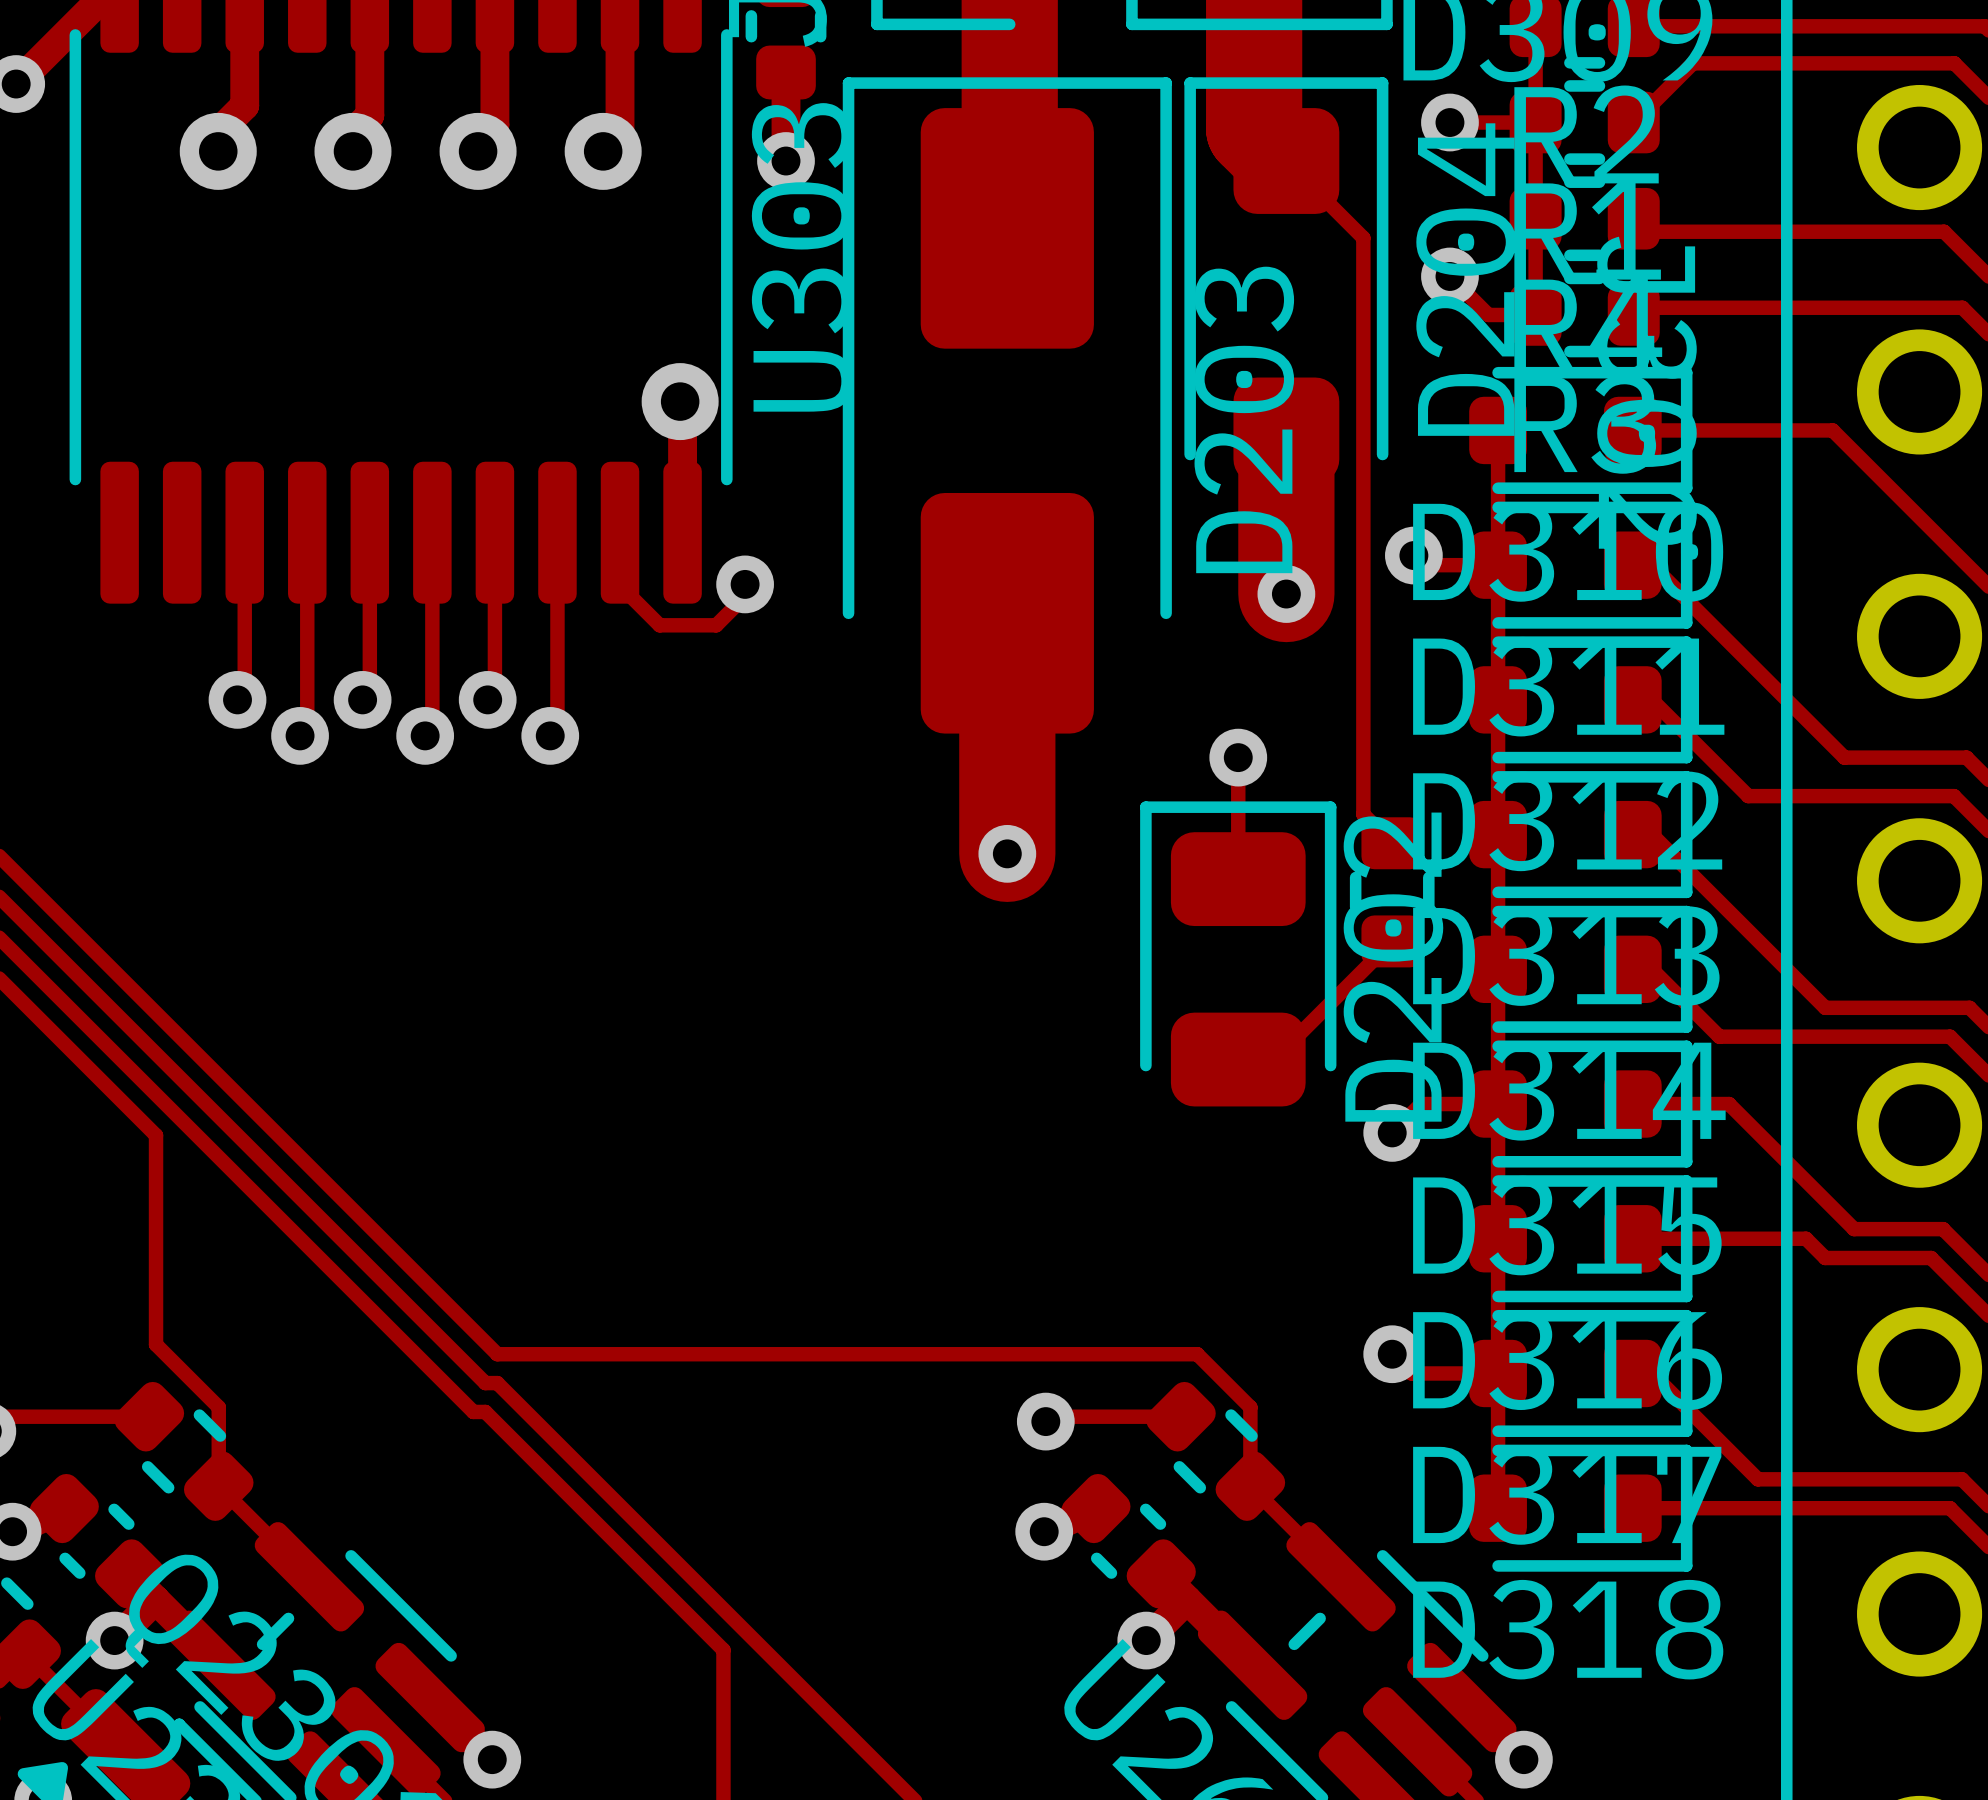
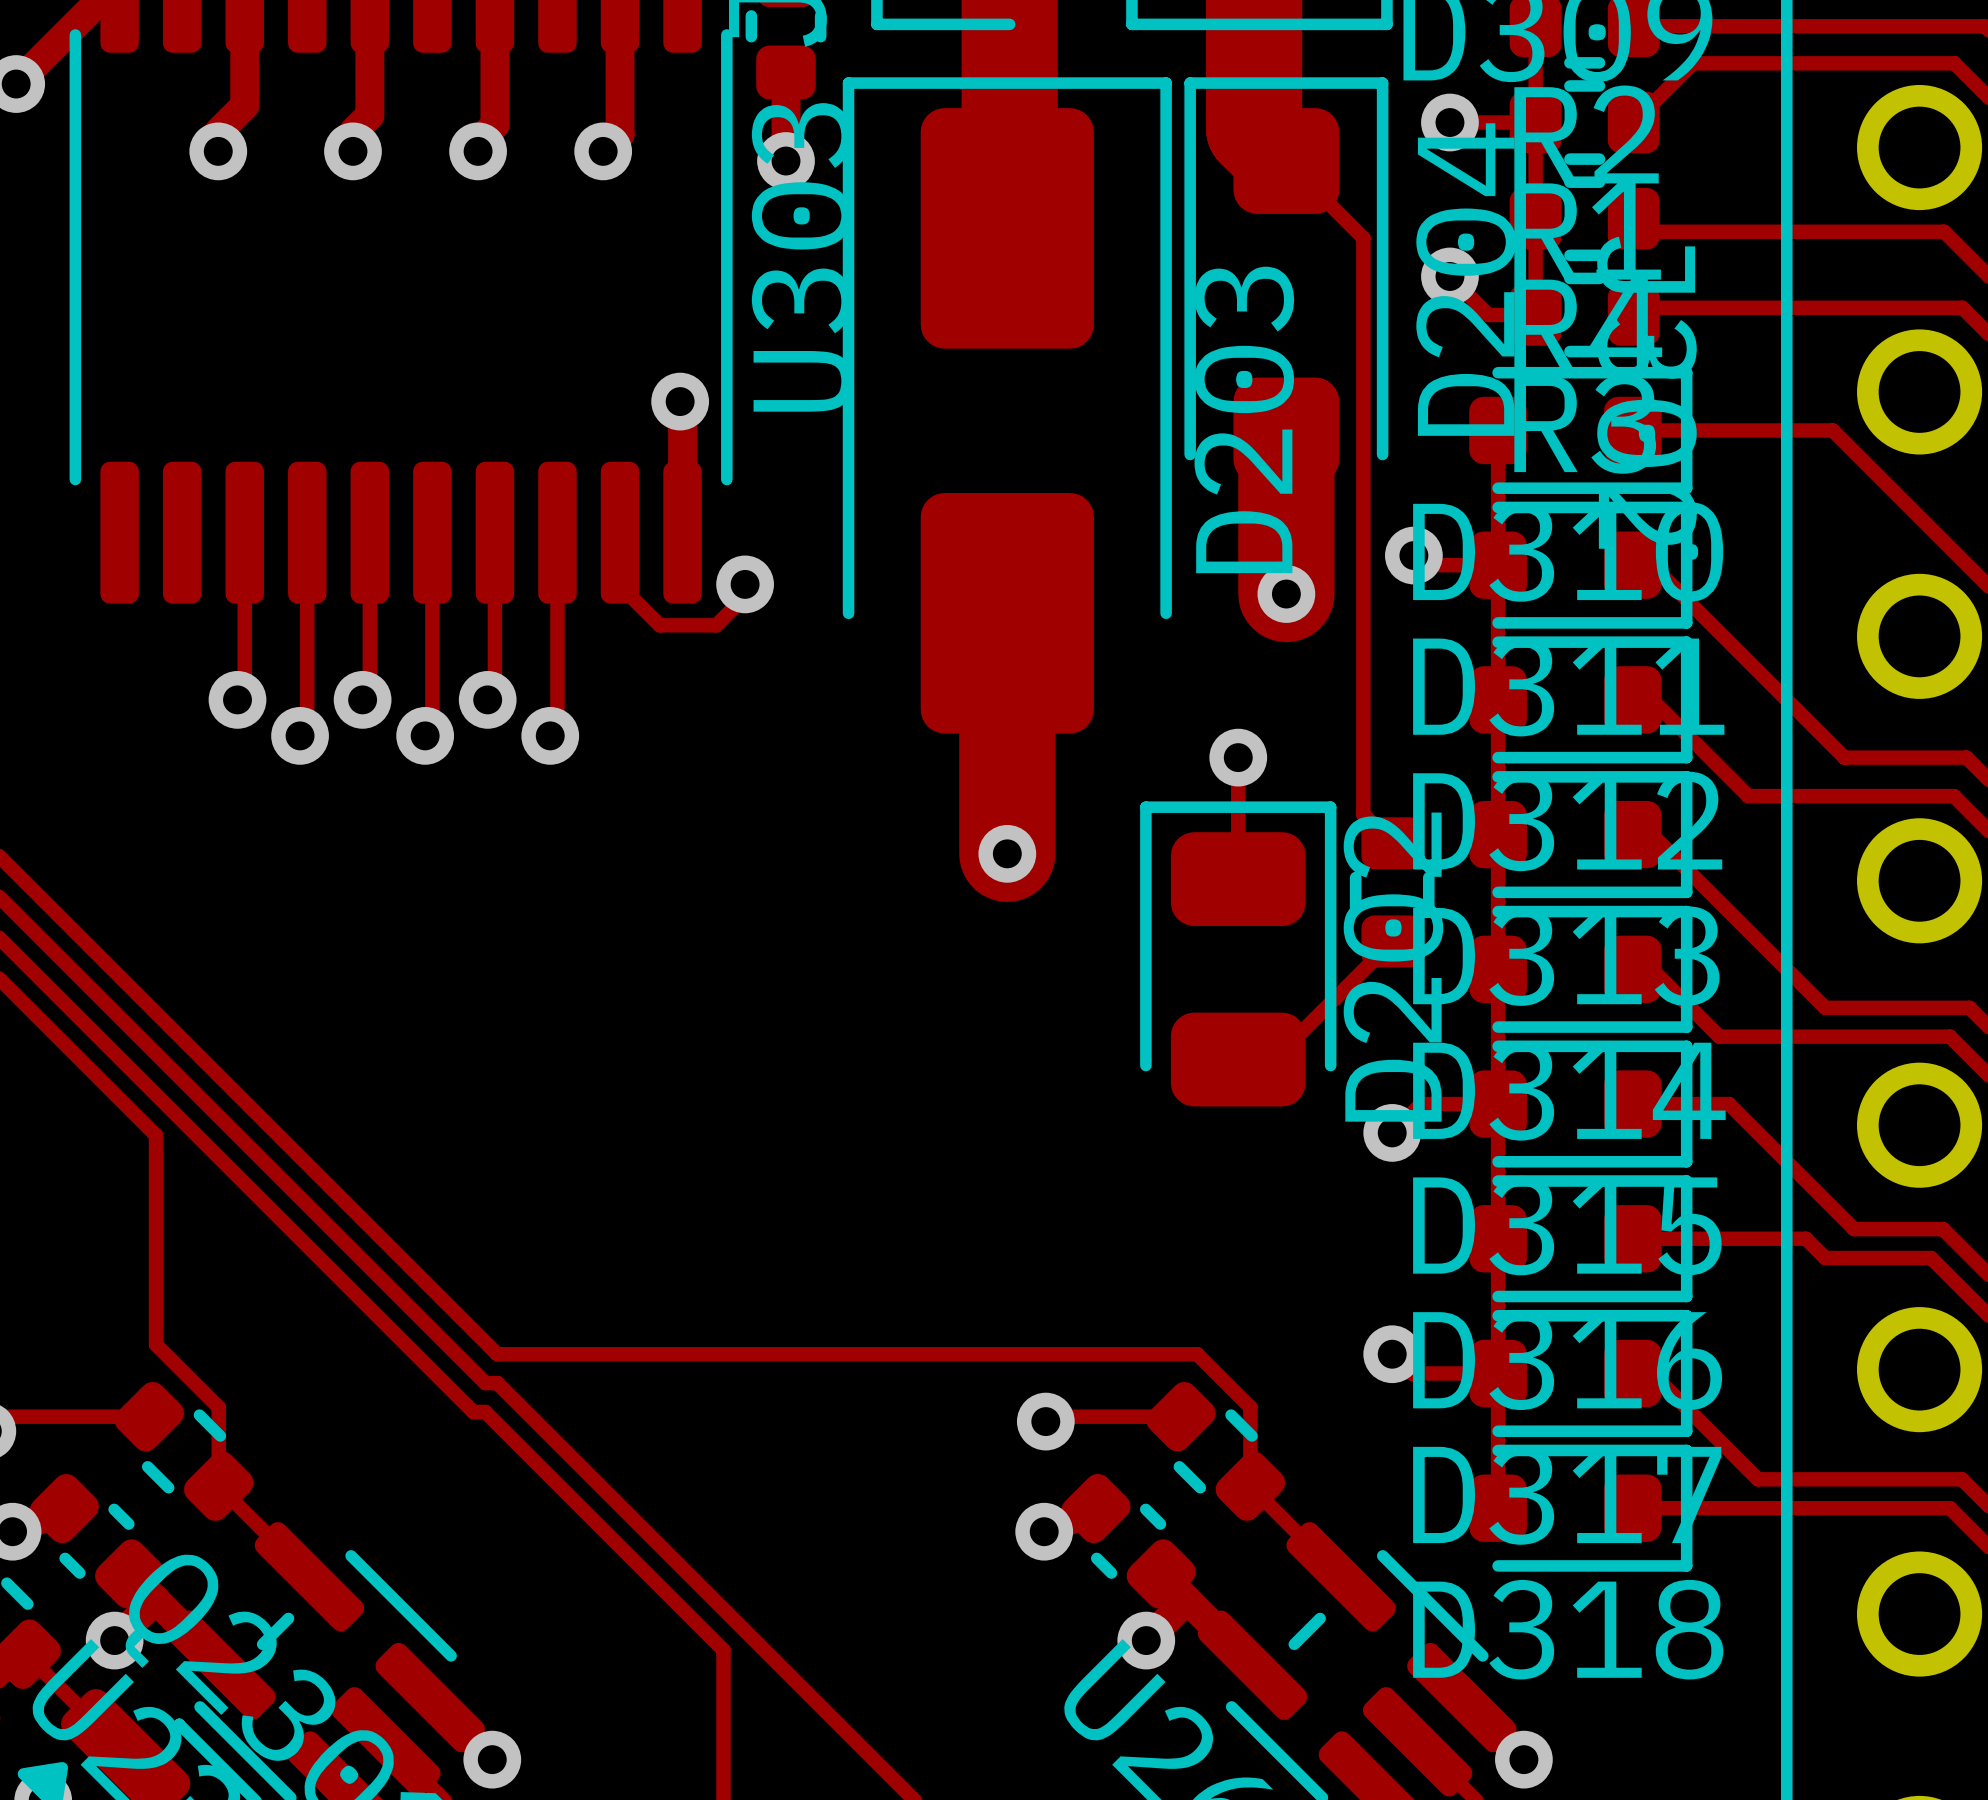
via size: [179, 112, 257, 190] -> [189, 122, 248, 181]
via size: [314, 112, 392, 190] -> [324, 122, 382, 181]
via size: [439, 112, 517, 190] -> [449, 122, 507, 181]
via size: [564, 112, 642, 190] -> [574, 122, 633, 181]
via size: [641, 363, 719, 441] -> [651, 372, 710, 431]

